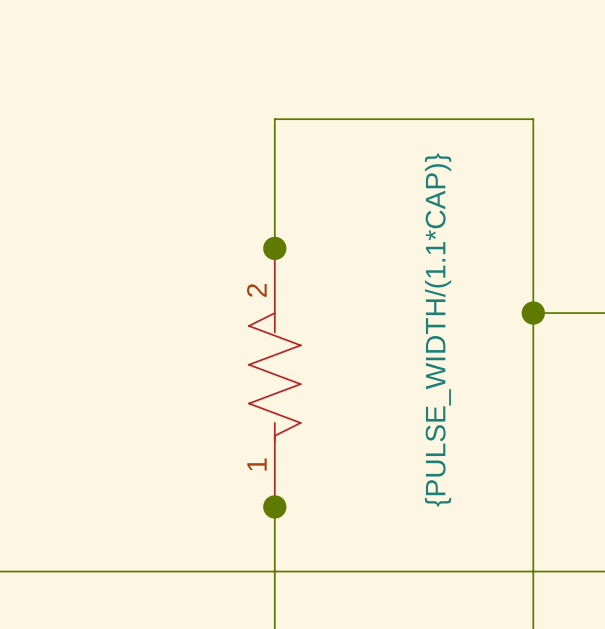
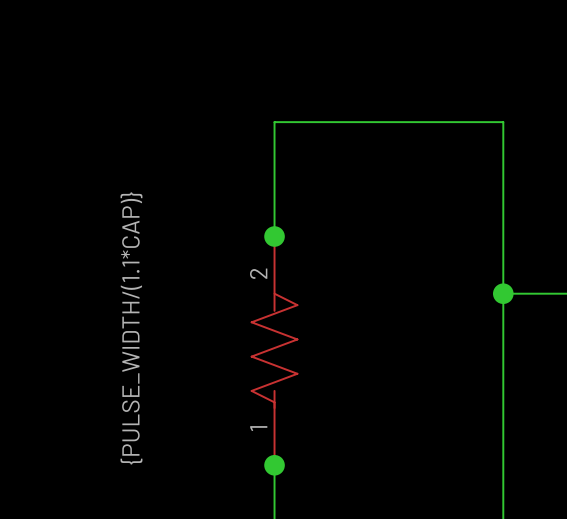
part flip: as is (274, 377) -> left-right (274, 350)

